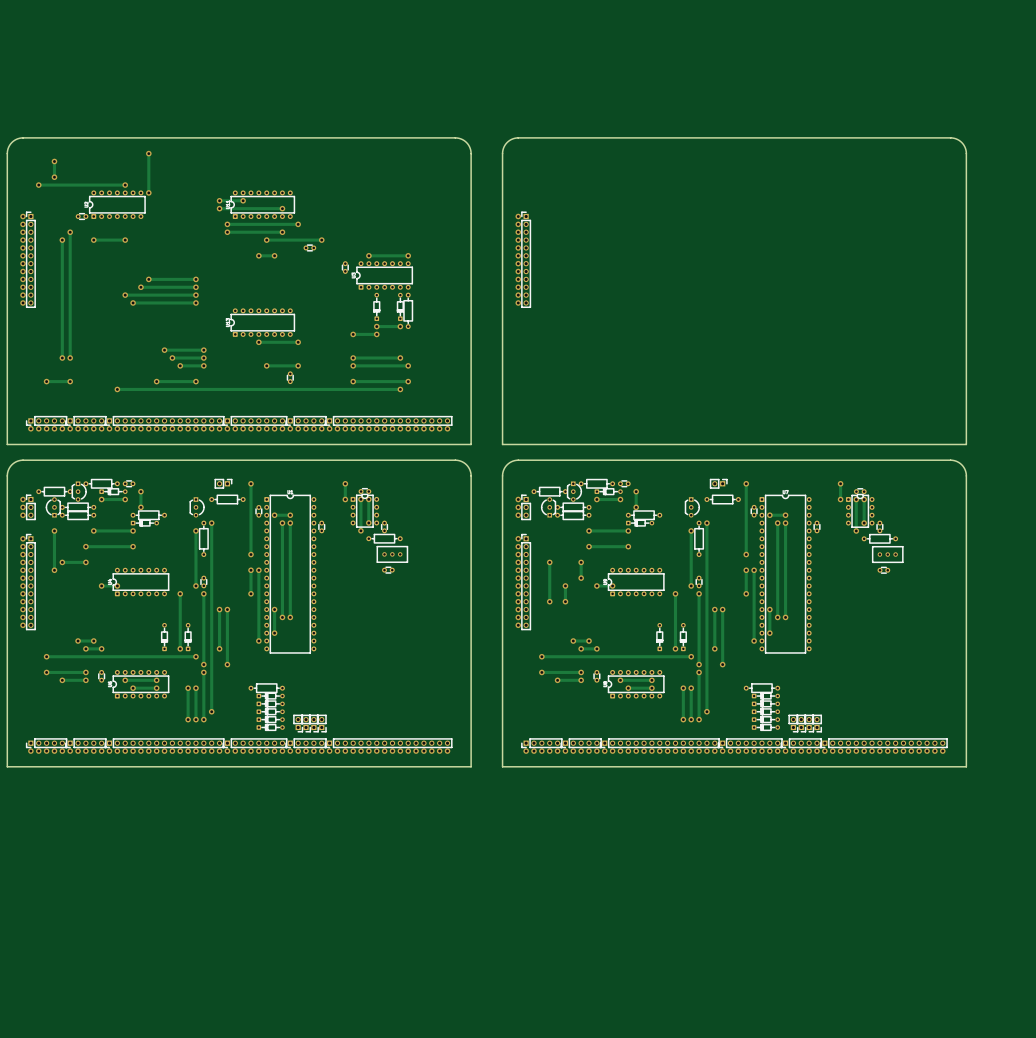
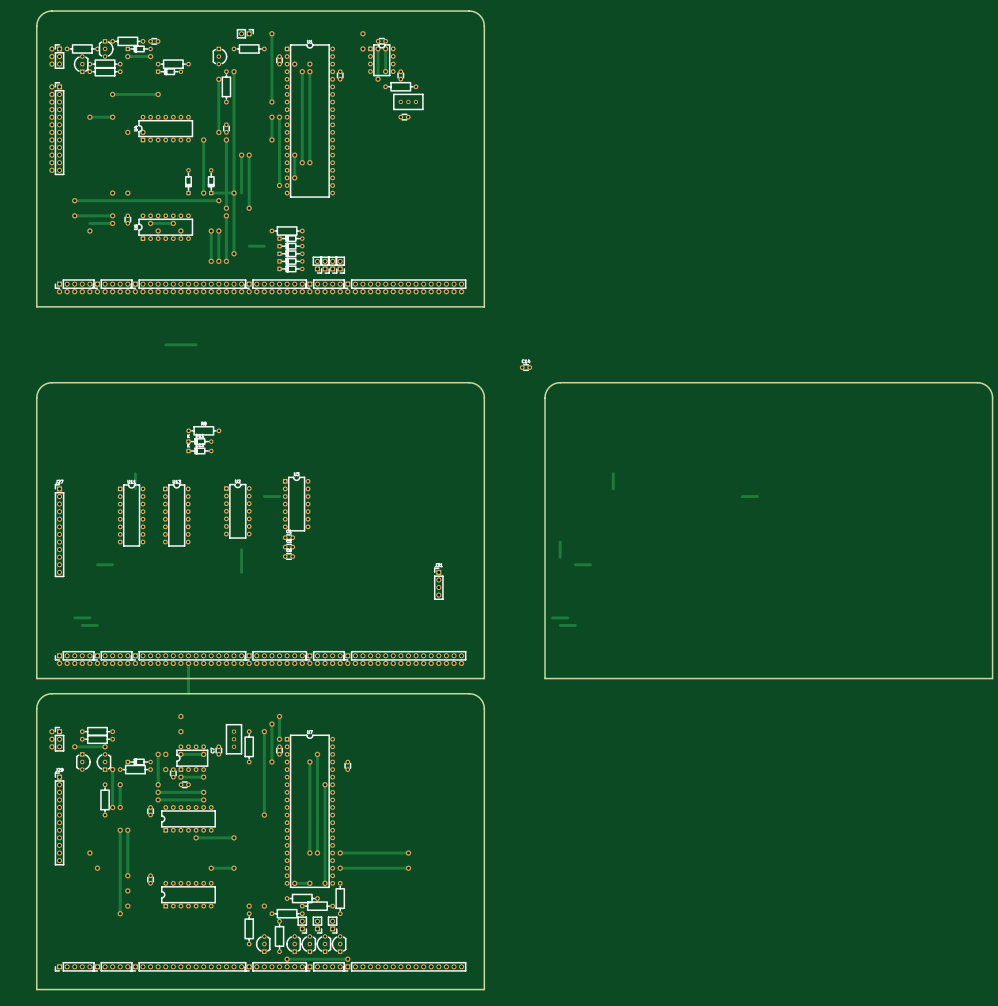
part: none -> (245, 33)
track: none -> (271, 33) (271, 102)
via: none -> (271, 33)
via: none -> (362, 33)
part: none -> (127, 41)
part: none -> (154, 41)
part: none -> (381, 41)
via: none -> (51, 48)
part: none -> (82, 48)
part: none -> (106, 48)
part: none -> (139, 48)
part: none -> (249, 48)
via: none -> (362, 48)
track: none -> (378, 48) (378, 79)
via: none -> (378, 48)
track: none -> (385, 48) (385, 71)
via: none -> (385, 48)
via: none -> (51, 56)
part: none -> (59, 56)
track: none -> (127, 56) (150, 56)
via: none -> (127, 56)
via: none -> (150, 56)
part: none -> (219, 56)
part: none -> (279, 60)
part: none -> (381, 60)
via: none -> (51, 64)
part: none -> (81, 64)
part: none -> (105, 64)
part: none -> (173, 64)
via: none -> (294, 64)
via: none -> (309, 64)
via: none -> (385, 71)
part: none -> (105, 71)
part: none -> (169, 71)
track: none -> (234, 71) (234, 253)
via: none -> (234, 71)
track: none -> (302, 71) (302, 162)
via: none -> (302, 71)
track: none -> (309, 71) (309, 162)
via: none -> (309, 71)
part: none -> (340, 75)
part: none -> (400, 75)
track: none -> (218, 79) (218, 132)
via: none -> (218, 79)
via: none -> (378, 79)
via: none -> (51, 86)
part: none -> (226, 86)
part: none -> (400, 86)
via: none -> (51, 94)
track: none -> (112, 94) (158, 94)
via: none -> (112, 94)
via: none -> (158, 94)
via: none -> (51, 102)
via: none -> (271, 102)
part: none -> (408, 101)
via: none -> (51, 109)
via: none -> (51, 117)
track: none -> (89, 117) (112, 117)
via: none -> (89, 117)
via: none -> (112, 117)
track: none -> (271, 117) (271, 139)
via: none -> (271, 117)
track: none -> (279, 117) (279, 185)
via: none -> (279, 117)
part: none -> (404, 117)
via: none -> (51, 124)
part: none -> (59, 128)
part: none -> (226, 128)
board edge: (23, 137) (455, 137) (463, 140) (469, 146) (471, 153) (471, 444) (7, 444) (7, 153) (11, 142) (23, 137) -> none
via: none -> (51, 132)
via: none -> (127, 132)
via: none -> (142, 132)
via: none -> (218, 132)
via: none -> (51, 139)
track: none -> (203, 139) (203, 193)
via: none -> (203, 139)
track: none -> (226, 139) (226, 208)
via: none -> (226, 139)
via: none -> (271, 139)
via: none -> (51, 147)
track: (148, 153) (148, 192) -> none
via: (148, 153) -> none
board edge: (502, 153) (507, 142) (518, 137) (950, 137) (961, 142) (966, 153) (966, 444) (502, 444) -> (484, 147) (484, 24) (481, 16) (472, 11) (51, 11) (42, 14) (37, 22) (36, 306) (484, 306)
track: (54, 161) (54, 177) -> none
track: none -> (241, 155) (241, 193)
via: none -> (241, 155)
track: none -> (249, 155) (249, 208)
via: none -> (249, 155)
track: none -> (294, 155) (294, 177)
via: none -> (294, 155)
via: none -> (51, 162)
via: none -> (302, 162)
via: none -> (309, 162)
track: (38, 185) (125, 185) -> none
via: (38, 185) -> none
via: (125, 185) -> none
via: none -> (294, 177)
part: none -> (188, 181)
part: none -> (211, 181)
via: (148, 192) -> none
via: none -> (279, 185)
via: none -> (112, 193)
via: none -> (127, 193)
via: none -> (203, 193)
via: (219, 200) -> none
part rotation: 0° (117, 204) -> 90° clockwise (237, 511)
part position: (117, 204) -> (237, 511)
part rotation: 0° (262, 204) -> 90° clockwise (131, 515)
part position: (262, 204) -> (131, 515)
track: none -> (74, 200) (211, 200)
via: none -> (74, 200)
via: (219, 208) -> none
track: (227, 208) (282, 208) -> none
via: none -> (218, 200)
via: (282, 208) -> none
via: (23, 216) -> none
part rotation: 0° (82, 216) -> 90° clockwise (127, 219)
part position: (82, 216) -> (127, 219)
via: none -> (226, 208)
via: none -> (249, 208)
via: (518, 216) -> none
via: (23, 224) -> none
track: none -> (74, 215) (112, 215)
via: none -> (74, 215)
via: none -> (112, 215)
track: (227, 224) (298, 224) -> none
via: (227, 224) -> none
track: none -> (226, 215) (226, 261)
via: none -> (226, 215)
via: (298, 224) -> none
via: (518, 224) -> none
via: (23, 232) -> none
track: (70, 232) (70, 358) -> none
via: (70, 232) -> none
track: none -> (89, 223) (112, 223)
via: none -> (112, 223)
track: none -> (150, 223) (173, 223)
via: none -> (150, 223)
via: none -> (173, 223)
track: (227, 232) (282, 232) -> none
via: (227, 232) -> none
via: (282, 232) -> none
via: (518, 232) -> none
via: (23, 240) -> none
track: (62, 240) (62, 358) -> none
via: (62, 240) -> none
track: (93, 240) (125, 240) -> none
via: (125, 240) -> none
via: none -> (158, 231)
via: none -> (180, 231)
track: none -> (211, 231) (211, 261)
via: none -> (211, 231)
track: none -> (218, 231) (218, 261)
via: none -> (218, 231)
track: (266, 240) (321, 240) -> none
via: (266, 240) -> none
part: none -> (287, 231)
via: (321, 240) -> none
via: (518, 240) -> none
via: (23, 247) -> none
part: none -> (290, 238)
part: (309, 247) -> none
via: (518, 247) -> none
via: (23, 255) -> none
via: (258, 255) -> none
via: (274, 255) -> none
part: none -> (290, 246)
track: (368, 255) (408, 255) -> none
via: (368, 255) -> none
via: (408, 255) -> none
via: (518, 255) -> none
part: (30, 259) -> none
part: (526, 259) -> none
via: (23, 263) -> none
via: none -> (234, 253)
part: none -> (290, 253)
via: (518, 263) -> none
part: (345, 267) -> none
via: (23, 271) -> none
via: none -> (211, 261)
via: none -> (218, 261)
via: none -> (226, 261)
part: none -> (290, 261)
via: (518, 271) -> none
part: none -> (317, 265)
part: none -> (325, 265)
part: none -> (332, 265)
part: none -> (340, 265)
part rotation: 0° (384, 275) -> 90° clockwise (296, 504)
part position: (384, 275) -> (296, 504)
via: (23, 279) -> none
track: (148, 279) (195, 279) -> none
via: (148, 279) -> none
via: (195, 279) -> none
part: none -> (290, 268)
via: (518, 279) -> none
via: (23, 287) -> none
track: (140, 287) (195, 287) -> none
via: (140, 287) -> none
via: (195, 287) -> none
via: (518, 287) -> none
via: (23, 295) -> none
part: none -> (74, 284)
part: none -> (112, 284)
track: (125, 295) (195, 295) -> none
via: (125, 295) -> none
part: none -> (188, 284)
via: (195, 295) -> none
part: none -> (275, 284)
part: none -> (325, 284)
part: none -> (404, 284)
via: (518, 295) -> none
via: (23, 302) -> none
via: none -> (59, 291)
via: none -> (67, 291)
via: none -> (74, 291)
via: none -> (82, 291)
via: none -> (89, 291)
via: none -> (97, 291)
via: none -> (105, 291)
via: none -> (112, 291)
via: none -> (120, 291)
track: (133, 302) (195, 302) -> none
via: none -> (135, 291)
via: none -> (142, 291)
via: none -> (150, 291)
via: none -> (158, 291)
via: none -> (165, 291)
via: none -> (173, 291)
via: none -> (180, 291)
via: none -> (196, 291)
via: none -> (203, 291)
via: none -> (211, 291)
via: none -> (218, 291)
via: none -> (226, 291)
via: none -> (234, 291)
via: none -> (241, 291)
via: none -> (249, 291)
via: none -> (256, 291)
via: none -> (264, 291)
via: none -> (271, 291)
via: none -> (279, 291)
via: none -> (287, 291)
via: none -> (294, 291)
via: none -> (302, 291)
via: none -> (309, 291)
via: none -> (317, 291)
via: none -> (325, 291)
via: none -> (332, 291)
via: none -> (340, 291)
via: none -> (347, 291)
via: none -> (355, 291)
via: none -> (362, 291)
via: none -> (370, 291)
via: none -> (378, 291)
via: none -> (385, 291)
via: none -> (393, 291)
via: none -> (400, 291)
via: none -> (408, 291)
via: none -> (416, 291)
via: none -> (423, 291)
via: none -> (431, 291)
via: none -> (438, 291)
via: none -> (446, 291)
via: none -> (453, 291)
via: none -> (461, 291)
via: (518, 302) -> none
part: (376, 306) -> none
part: (400, 306) -> none
part: (408, 310) -> none
board edge: (502, 318) (502, 413) -> (484, 678) (36, 678) (36, 397) (39, 389) (43, 385) (51, 382) (469, 382) (479, 387) (484, 397)
part rotation: 0° (262, 322) -> 90° clockwise (176, 515)
part position: (262, 322) -> (176, 515)
track: (376, 326) (400, 326) -> none
via: (376, 326) -> none
via: (400, 326) -> none
track: (353, 334) (376, 334) -> none
via: (353, 334) -> none
via: (376, 334) -> none
track: (258, 342) (298, 342) -> none
via: (258, 342) -> none
via: (298, 342) -> none
track: (164, 350) (203, 350) -> none
via: (164, 350) -> none
via: (203, 350) -> none
via: (62, 358) -> none
via: (70, 358) -> none
via: (172, 358) -> none
via: (203, 358) -> none
track: (353, 358) (400, 358) -> none
via: (353, 358) -> none
via: (400, 358) -> none
track: (180, 365) (203, 365) -> none
via: (180, 365) -> none
via: (203, 365) -> none
track: (266, 365) (298, 365) -> none
via: (266, 365) -> none
via: (298, 365) -> none
track: (353, 365) (408, 365) -> none
via: (353, 365) -> none
via: (408, 365) -> none
part: (290, 377) -> none
track: (46, 381) (70, 381) -> none
via: (46, 381) -> none
via: (70, 381) -> none
track: (156, 381) (195, 381) -> none
via: (156, 381) -> none
via: (195, 381) -> none
track: (353, 381) (408, 381) -> none
via: (353, 381) -> none
via: (408, 381) -> none
part: none -> (525, 367)
track: (117, 389) (400, 389) -> none
via: (117, 389) -> none
via: (400, 389) -> none
board edge: none -> (560, 382) (977, 382) (985, 385) (991, 391) (992, 397) (992, 678) (545, 678) (545, 397) (549, 387) (560, 382)
part: (46, 420) -> none
part: (85, 420) -> none
part: (164, 420) -> none
part: (254, 420) -> none
part: (306, 420) -> none
part: (388, 420) -> none
via: (30, 428) -> none
via: (38, 428) -> none
via: (46, 428) -> none
via: (54, 428) -> none
via: (62, 428) -> none
via: (70, 428) -> none
via: (78, 428) -> none
via: (85, 428) -> none
via: (93, 428) -> none
via: (101, 428) -> none
via: (109, 428) -> none
via: (117, 428) -> none
via: (125, 428) -> none
via: (133, 428) -> none
via: (140, 428) -> none
via: (148, 428) -> none
via: (156, 428) -> none
via: (164, 428) -> none
via: (172, 428) -> none
via: (180, 428) -> none
via: (188, 428) -> none
via: (195, 428) -> none
via: (203, 428) -> none
via: (211, 428) -> none
via: (219, 428) -> none
via: (227, 428) -> none
via: (235, 428) -> none
via: (243, 428) -> none
via: (251, 428) -> none
via: (258, 428) -> none
via: (266, 428) -> none
via: (274, 428) -> none
via: (282, 428) -> none
via: (290, 428) -> none
via: (298, 428) -> none
via: (306, 428) -> none
via: (313, 428) -> none
via: (321, 428) -> none
via: (329, 428) -> none
via: (337, 428) -> none
via: (345, 428) -> none
via: (353, 428) -> none
via: (361, 428) -> none
via: (368, 428) -> none
via: (376, 428) -> none
via: (384, 428) -> none
via: (392, 428) -> none
via: (400, 428) -> none
via: (408, 428) -> none
via: (416, 428) -> none
via: (423, 428) -> none
via: (431, 428) -> none
via: (439, 428) -> none
via: (447, 428) -> none
part: none -> (203, 430)
part: none -> (199, 441)
board edge: (23, 460) (455, 460) (463, 462) (468, 467) (471, 475) (471, 766) (7, 766) (7, 475) (11, 464) (23, 460) -> none
part: none -> (199, 450)
board edge: (502, 475) (507, 464) (518, 460) (950, 460) (961, 464) (966, 475) (966, 766) (502, 766) -> (484, 458) (484, 428)
part: (101, 483) -> none
part: (129, 483) -> none
part: (223, 483) -> none
track: (251, 483) (251, 554) -> none
via: (251, 483) -> none
track: (345, 483) (345, 499) -> none
via: (345, 483) -> none
part: (596, 483) -> none
part: (624, 483) -> none
part: (718, 483) -> none
track: (746, 483) (746, 554) -> none
via: (746, 483) -> none
track: (840, 483) (840, 499) -> none
via: (840, 483) -> none
part: (54, 491) -> none
part: (79, 491) -> none
part: (113, 491) -> none
via: (140, 491) -> none
part: (364, 491) -> none
part: (549, 491) -> none
part: (574, 491) -> none
part: (608, 491) -> none
via: (636, 491) -> none
part: (860, 491) -> none
via: (23, 499) -> none
track: (101, 499) (125, 499) -> none
via: (101, 499) -> none
via: (125, 499) -> none
part: (227, 499) -> none
via: (345, 499) -> none
track: (360, 499) (360, 530) -> none
via: (360, 499) -> none
track: (368, 499) (368, 522) -> none
via: (368, 499) -> none
via: (518, 499) -> none
track: (596, 499) (620, 499) -> none
via: (596, 499) -> none
via: (620, 499) -> none
part: (722, 499) -> none
via: (840, 499) -> none
track: (856, 499) (856, 530) -> none
via: (856, 499) -> none
track: (864, 499) (864, 523) -> none
via: (864, 499) -> none
via: (23, 507) -> none
part: (30, 507) -> none
part: (53, 507) -> none
part: (78, 507) -> none
via: (140, 507) -> none
part: (197, 507) -> none
via: (518, 507) -> none
part: (526, 507) -> none
part: (548, 507) -> none
part: (573, 507) -> none
via: (636, 507) -> none
part: (692, 507) -> none
part: (258, 511) -> none
part: (364, 511) -> none
part: (754, 511) -> none
part: (860, 511) -> none
via: (23, 515) -> none
part: (78, 515) -> none
part: (148, 515) -> none
via: (274, 515) -> none
via: (290, 515) -> none
via: (518, 515) -> none
part: (573, 515) -> none
part: (644, 515) -> none
via: (769, 515) -> none
via: (785, 515) -> none
via: (368, 522) -> none
part: (144, 523) -> none
track: (211, 523) (211, 711) -> none
via: (211, 523) -> none
track: (282, 523) (282, 617) -> none
via: (282, 523) -> none
track: (290, 523) (290, 617) -> none
via: (290, 523) -> none
part: (640, 523) -> none
track: (706, 523) (706, 711) -> none
via: (706, 523) -> none
track: (777, 523) (777, 617) -> none
via: (777, 523) -> none
track: (785, 523) (785, 617) -> none
via: (785, 523) -> none
via: (864, 523) -> none
part: (321, 526) -> none
part: (384, 526) -> none
part: (817, 526) -> none
part: (879, 526) -> none
track: (54, 530) (54, 570) -> none
via: (54, 530) -> none
track: (93, 530) (133, 530) -> none
via: (93, 530) -> none
via: (133, 530) -> none
track: (195, 530) (195, 585) -> none
via: (195, 530) -> none
via: (360, 530) -> none
track: (589, 530) (628, 530) -> none
via: (589, 530) -> none
via: (628, 530) -> none
track: (691, 530) (691, 585) -> none
via: (691, 530) -> none
via: (856, 530) -> none
via: (23, 538) -> none
part: (203, 538) -> none
part: (384, 538) -> none
via: (518, 538) -> none
part: (699, 538) -> none
part: (879, 538) -> none
via: (23, 546) -> none
track: (85, 546) (133, 546) -> none
via: (85, 546) -> none
via: (133, 546) -> none
via: (518, 546) -> none
track: (589, 546) (628, 546) -> none
via: (589, 546) -> none
via: (628, 546) -> none
part: none -> (59, 530)
via: (23, 554) -> none
via: (251, 554) -> none
part: (392, 554) -> none
via: (518, 554) -> none
via: (746, 554) -> none
part: (887, 554) -> none
part: none -> (288, 537)
via: (23, 562) -> none
track: (62, 562) (85, 562) -> none
via: (62, 562) -> none
via: (85, 562) -> none
via: (518, 562) -> none
track: (549, 562) (549, 601) -> none
via: (549, 562) -> none
via: (581, 562) -> none
part: none -> (288, 547)
via: (23, 570) -> none
via: (54, 570) -> none
via: (251, 570) -> none
track: (258, 570) (258, 641) -> none
via: (258, 570) -> none
part: (388, 570) -> none
via: (518, 570) -> none
track: (746, 570) (746, 593) -> none
via: (746, 570) -> none
track: (754, 570) (754, 641) -> none
via: (754, 570) -> none
part: (883, 570) -> none
part position: (290, 574) -> (309, 121)
part position: (785, 574) -> (309, 811)
part: none -> (288, 556)
via: (23, 578) -> none
via: (518, 578) -> none
via: (581, 578) -> none
part: (203, 581) -> none
part: (699, 581) -> none
part: (30, 582) -> none
part position: (140, 582) -> (165, 128)
part: (526, 582) -> none
part: (636, 582) -> none
via: (23, 585) -> none
via: (101, 585) -> none
via: (117, 585) -> none
via: (195, 585) -> none
via: (518, 585) -> none
track: (565, 585) (565, 601) -> none
via: (565, 585) -> none
via: (596, 585) -> none
via: (612, 585) -> none
via: (691, 585) -> none
via: (23, 593) -> none
track: (180, 593) (180, 648) -> none
via: (180, 593) -> none
track: (203, 593) (203, 664) -> none
via: (203, 593) -> none
via: (251, 593) -> none
via: (518, 593) -> none
track: (675, 593) (675, 648) -> none
via: (675, 593) -> none
track: (699, 593) (699, 664) -> none
via: (699, 593) -> none
via: (746, 593) -> none
via: (23, 601) -> none
via: (518, 601) -> none
via: (549, 601) -> none
via: (565, 601) -> none
part: none -> (438, 583)
via: (23, 609) -> none
track: (219, 609) (219, 648) -> none
via: (219, 609) -> none
track: (227, 609) (227, 664) -> none
via: (227, 609) -> none
track: (274, 609) (274, 633) -> none
via: (274, 609) -> none
via: (518, 609) -> none
track: (714, 609) (714, 648) -> none
via: (714, 609) -> none
track: (722, 609) (722, 664) -> none
via: (722, 609) -> none
track: (769, 609) (769, 633) -> none
via: (769, 609) -> none
via: (23, 617) -> none
via: (282, 617) -> none
via: (290, 617) -> none
via: (518, 617) -> none
via: (777, 617) -> none
via: (785, 617) -> none
via: (23, 625) -> none
via: (518, 625) -> none
via: (274, 633) -> none
via: (769, 633) -> none
part: (164, 637) -> none
part: (188, 637) -> none
part: (659, 637) -> none
part: (683, 637) -> none
via: (78, 641) -> none
via: (93, 641) -> none
via: (258, 641) -> none
via: (573, 641) -> none
via: (589, 641) -> none
via: (754, 641) -> none
via: (85, 648) -> none
via: (101, 648) -> none
via: (180, 648) -> none
via: (219, 648) -> none
via: (581, 648) -> none
via: (596, 648) -> none
via: (675, 648) -> none
via: (714, 648) -> none
track: (46, 656) (195, 656) -> none
via: (46, 656) -> none
via: (195, 656) -> none
track: (541, 656) (691, 656) -> none
via: (541, 656) -> none
via: (691, 656) -> none
via: (203, 664) -> none
via: (227, 664) -> none
via: (699, 664) -> none
via: (722, 664) -> none
track: (46, 672) (85, 672) -> none
via: (46, 672) -> none
via: (85, 672) -> none
track: (203, 672) (203, 719) -> none
via: (203, 672) -> none
track: (541, 672) (581, 672) -> none
via: (541, 672) -> none
via: (581, 672) -> none
track: (699, 672) (699, 719) -> none
via: (699, 672) -> none
part: (101, 676) -> none
part: (596, 676) -> none
track: (62, 680) (85, 680) -> none
via: (62, 680) -> none
part: none -> (74, 655)
via: (85, 680) -> none
part: none -> (112, 655)
track: (125, 680) (156, 680) -> none
via: (125, 680) -> none
via: (156, 680) -> none
track: (557, 680) (581, 680) -> none
via: (557, 680) -> none
via: (581, 680) -> none
track: (620, 680) (651, 680) -> none
via: (620, 680) -> none
via: (651, 680) -> none
part position: (140, 684) -> (165, 227)
part: (636, 684) -> none
via: none -> (59, 663)
via: none -> (67, 663)
via: none -> (74, 663)
via: none -> (82, 663)
via: none -> (89, 663)
via: none -> (97, 663)
via: none -> (105, 663)
via: none -> (112, 663)
via: none -> (120, 663)
track: (133, 688) (156, 688) -> none
via: none -> (135, 663)
via: none -> (142, 663)
via: none -> (158, 663)
via: none -> (165, 663)
via: none -> (173, 663)
track: (188, 688) (188, 719) -> none
via: none -> (196, 663)
via: none -> (203, 663)
via: none -> (211, 663)
via: none -> (218, 663)
via: none -> (226, 663)
via: none -> (234, 663)
via: none -> (241, 663)
via: none -> (249, 663)
part: (266, 688) -> none
via: none -> (256, 663)
via: none -> (264, 663)
via: none -> (271, 663)
via: none -> (279, 663)
via: none -> (287, 663)
via: none -> (294, 663)
via: none -> (302, 663)
via: none -> (309, 663)
via: none -> (317, 663)
via: none -> (325, 663)
via: none -> (332, 663)
via: none -> (340, 663)
via: none -> (347, 663)
via: none -> (355, 663)
via: none -> (362, 663)
via: none -> (370, 663)
via: none -> (378, 663)
via: none -> (385, 663)
via: none -> (393, 663)
via: none -> (400, 663)
via: none -> (408, 663)
via: none -> (416, 663)
via: none -> (423, 663)
via: none -> (431, 663)
via: none -> (438, 663)
via: none -> (446, 663)
via: none -> (453, 663)
via: none -> (461, 663)
track: (628, 688) (651, 688) -> none
via: (628, 688) -> none
via: (651, 688) -> none
track: (683, 688) (683, 719) -> none
via: (683, 688) -> none
track: (691, 688) (691, 719) -> none
via: (691, 688) -> none
part: (761, 688) -> none
part: (270, 696) -> none
part: (765, 696) -> none
part: (270, 703) -> none
board edge: (502, 703) (502, 735) -> (484, 739) (484, 989) (36, 989) (36, 708) (38, 702) (43, 696) (51, 693) (469, 693) (479, 698) (484, 708)
part: (765, 703) -> none
via: (211, 711) -> none
part: (270, 711) -> none
via: (706, 711) -> none
part: (765, 711) -> none
via: (188, 719) -> none
via: (195, 719) -> none
via: (203, 719) -> none
part: (270, 719) -> none
via: (683, 719) -> none
via: (691, 719) -> none
via: (699, 719) -> none
part: (765, 719) -> none
part: (298, 723) -> none
part: (306, 723) -> none
part: (313, 723) -> none
part: (321, 723) -> none
part: (793, 723) -> none
part: (801, 723) -> none
part: (809, 723) -> none
part: (817, 723) -> none
part: (270, 727) -> none
part: (765, 727) -> none
part: (46, 743) -> none
part: (85, 743) -> none
part position: (164, 743) -> (188, 655)
via: none -> (180, 716)
part position: (254, 743) -> (275, 655)
track: none -> (279, 716) (279, 739)
via: none -> (279, 716)
part position: (306, 743) -> (325, 655)
part position: (388, 743) -> (404, 655)
part: (541, 743) -> none
part: (581, 743) -> none
part: (659, 743) -> none
part: (750, 743) -> none
part: (801, 743) -> none
part: (883, 743) -> none
via: (30, 751) -> none
via: (38, 751) -> none
via: (46, 751) -> none
via: (54, 751) -> none
via: (62, 751) -> none
via: (70, 751) -> none
via: (78, 751) -> none
via: (85, 751) -> none
via: (93, 751) -> none
via: (101, 751) -> none
via: (109, 751) -> none
via: (117, 751) -> none
via: (125, 751) -> none
via: (133, 751) -> none
via: (140, 751) -> none
via: (148, 751) -> none
via: (156, 751) -> none
via: (164, 751) -> none
via: (172, 751) -> none
via: (180, 751) -> none
via: (188, 751) -> none
via: (195, 751) -> none
via: (203, 751) -> none
via: (211, 751) -> none
via: (219, 751) -> none
via: (227, 751) -> none
via: (235, 751) -> none
via: (243, 751) -> none
via: (251, 751) -> none
via: (258, 751) -> none
via: (266, 751) -> none
via: (274, 751) -> none
track: none -> (271, 724) (271, 762)
via: (290, 751) -> none
via: (298, 751) -> none
via: (306, 751) -> none
via: (313, 751) -> none
via: (321, 751) -> none
via: (329, 751) -> none
via: (337, 751) -> none
via: (345, 751) -> none
via: (353, 751) -> none
via: (361, 751) -> none
via: (368, 751) -> none
via: (376, 751) -> none
via: (384, 751) -> none
via: (392, 751) -> none
via: (400, 751) -> none
via: (408, 751) -> none
via: (416, 751) -> none
via: (423, 751) -> none
via: (431, 751) -> none
via: (439, 751) -> none
via: (447, 751) -> none
via: (526, 751) -> none
via: (534, 751) -> none
via: (541, 751) -> none
via: (549, 751) -> none
via: (557, 751) -> none
via: (565, 751) -> none
via: (573, 751) -> none
via: (581, 751) -> none
via: (589, 751) -> none
via: (596, 751) -> none
via: (604, 751) -> none
via: (612, 751) -> none
via: (620, 751) -> none
via: (628, 751) -> none
via: (636, 751) -> none
via: (644, 751) -> none
via: (651, 751) -> none
via: (659, 751) -> none
via: (667, 751) -> none
via: (675, 751) -> none
via: (683, 751) -> none
via: (691, 751) -> none
via: (699, 751) -> none
via: (706, 751) -> none
via: (714, 751) -> none
via: (722, 751) -> none
via: (730, 751) -> none
via: (738, 751) -> none
via: (746, 751) -> none
via: (754, 751) -> none
via: (761, 751) -> none
via: (769, 751) -> none
via: (777, 751) -> none
via: (785, 751) -> none
via: (793, 751) -> none
via: (801, 751) -> none
via: (809, 751) -> none
via: (817, 751) -> none
via: (824, 751) -> none
via: (832, 751) -> none
via: (840, 751) -> none
via: (848, 751) -> none
via: (856, 751) -> none
via: (864, 751) -> none
via: (872, 751) -> none
via: (879, 751) -> none
via: (887, 751) -> none
via: (895, 751) -> none
via: (903, 751) -> none
via: (911, 751) -> none
via: (919, 751) -> none
via: (927, 751) -> none
via: (934, 751) -> none
via: (942, 751) -> none
via: none -> (51, 731)
part: none -> (97, 731)
via: none -> (180, 731)
track: none -> (264, 731) (264, 815)
via: none -> (264, 731)
via: none -> (51, 739)
part: none -> (59, 739)
part: none -> (97, 739)
part: none -> (233, 739)
via: none -> (279, 739)
via: none -> (51, 746)
track: none -> (74, 746) (105, 746)
via: none -> (74, 746)
via: none -> (105, 746)
part: none -> (249, 746)
part: none -> (218, 750)
part: none -> (279, 750)
track: none -> (158, 754) (158, 784)
via: none -> (158, 754)
via: none -> (165, 754)
track: none -> (180, 754) (203, 754)
via: none -> (180, 754)
via: none -> (203, 754)
track: none -> (317, 754) (317, 853)
via: none -> (317, 754)
part: none -> (192, 758)
part: none -> (83, 762)
part: none -> (103, 762)
part: none -> (139, 762)
via: none -> (271, 762)
track: none -> (309, 762) (309, 853)
via: none -> (309, 762)
part: none -> (347, 765)
track: none -> (112, 769) (112, 807)
via: none -> (112, 769)
part: none -> (135, 769)
via: none -> (165, 769)
part: none -> (173, 773)
track: none -> (180, 777) (203, 777)
via: none -> (180, 777)
via: none -> (203, 777)
track: none -> (120, 784) (120, 807)
via: none -> (120, 784)
via: none -> (158, 784)
part: none -> (184, 784)
track: none -> (325, 784) (325, 883)
via: none -> (325, 784)
track: none -> (158, 792) (203, 792)
via: none -> (158, 792)
via: none -> (203, 792)
part: none -> (105, 799)
track: none -> (158, 799) (203, 799)
via: none -> (158, 799)
via: none -> (203, 799)
via: none -> (112, 807)
via: none -> (120, 807)
part: none -> (150, 811)
via: none -> (264, 815)
part: none -> (59, 818)
part: none -> (188, 818)
track: none -> (120, 830) (120, 913)
via: none -> (120, 830)
track: none -> (127, 830) (127, 875)
via: none -> (127, 830)
track: none -> (196, 837) (234, 837)
via: none -> (196, 837)
via: none -> (234, 837)
via: none -> (89, 853)
via: none -> (309, 853)
via: none -> (317, 853)
track: none -> (340, 853) (408, 853)
via: none -> (340, 853)
via: none -> (408, 853)
via: none -> (97, 868)
track: none -> (211, 868) (234, 868)
via: none -> (211, 868)
via: none -> (234, 868)
track: none -> (340, 868) (408, 868)
via: none -> (340, 868)
via: none -> (408, 868)
via: none -> (127, 875)
part: none -> (150, 879)
track: none -> (294, 883) (309, 883)
via: none -> (294, 883)
via: none -> (309, 883)
via: none -> (325, 883)
via: none -> (127, 890)
part: none -> (188, 894)
part: none -> (302, 898)
part: none -> (340, 898)
via: none -> (127, 906)
via: none -> (249, 906)
via: none -> (264, 906)
part: none -> (317, 906)
via: none -> (120, 913)
part: none -> (287, 913)
part: none -> (302, 925)
part: none -> (317, 925)
part: none -> (332, 925)
part: none -> (249, 928)
part: none -> (279, 936)
part: none -> (263, 944)
part: none -> (293, 944)
part: none -> (308, 944)
part: none -> (323, 944)
part: none -> (339, 944)
track: none -> (287, 959) (347, 959)
via: none -> (287, 959)
via: none -> (347, 959)
part: none -> (74, 966)
part: none -> (112, 966)
part: none -> (188, 966)
part: none -> (275, 966)
part: none -> (325, 966)
part: none -> (404, 966)

